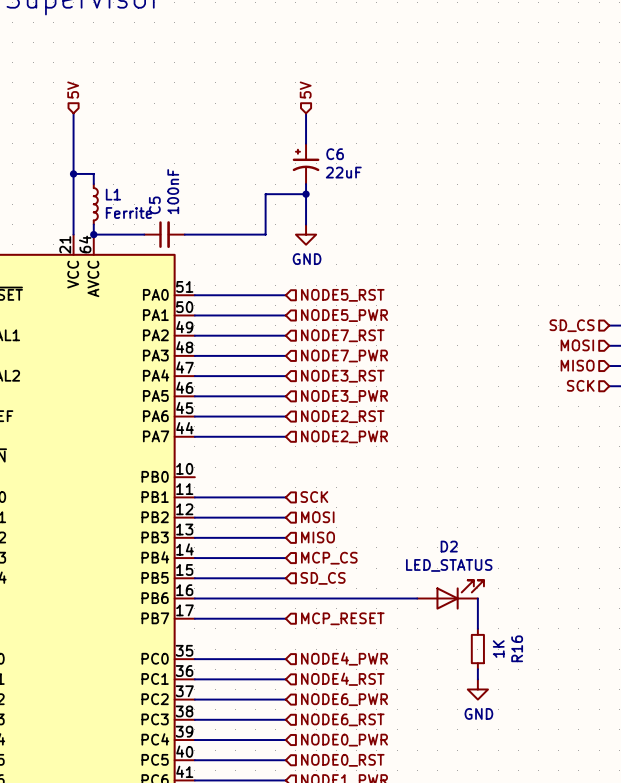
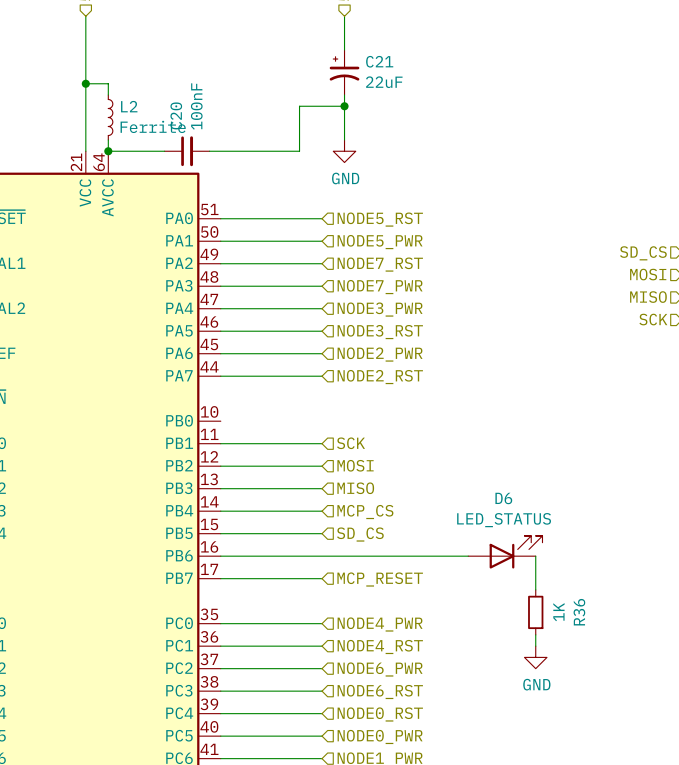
C6 name: C6 (335, 154) -> C21 (379, 61)
L1 name: L1 (113, 194) -> L2 (129, 106)
C5 name: C5 (154, 205) -> C20 (176, 115)
hierarchical label: NODE3_RST (342, 376) -> NODE3_PWR (380, 309)
hierarchical label: NODE3_PWR (344, 396) -> NODE3_RST (380, 332)
hierarchical label: NODE2_RST (342, 416) -> NODE2_PWR (380, 354)
hierarchical label: NODE2_PWR (344, 436) -> NODE2_RST (380, 377)
D2 name: D2 (449, 546) -> D6 (503, 498)
R16 name: R16 (517, 648) -> R36 (579, 612)
hierarchical label: NODE0_PWR (344, 740) -> NODE0_RST (380, 714)
hierarchical label: NODE0_RST (342, 760) -> NODE0_PWR (380, 736)

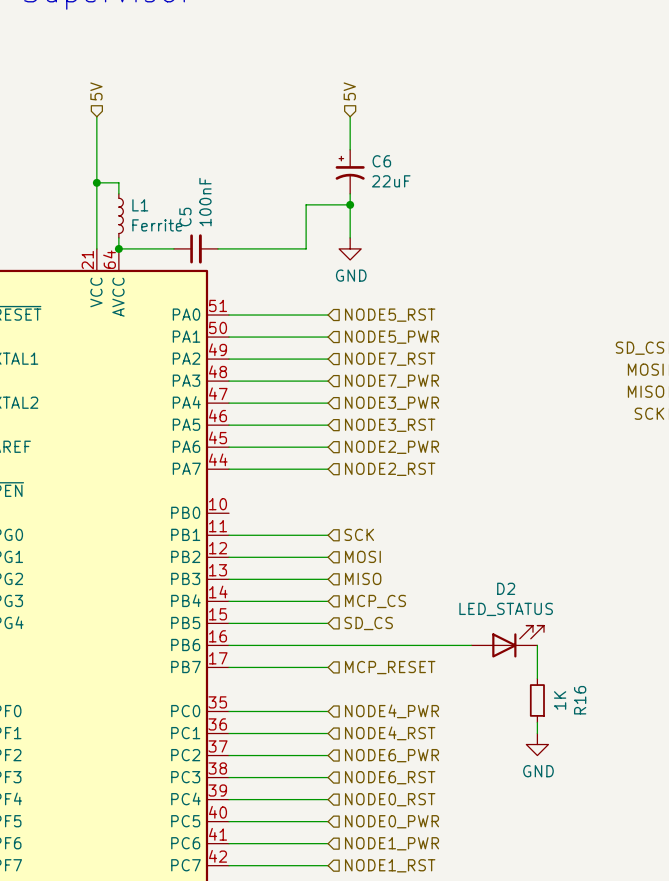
C21 name: C21 (379, 61) -> C6 (381, 161)
L2 name: L2 (129, 106) -> L1 (140, 205)
C20 name: C20 (176, 115) -> C5 (185, 217)
D6 name: D6 (503, 498) -> D2 (506, 588)
R36 name: R36 (579, 612) -> R16 (580, 700)

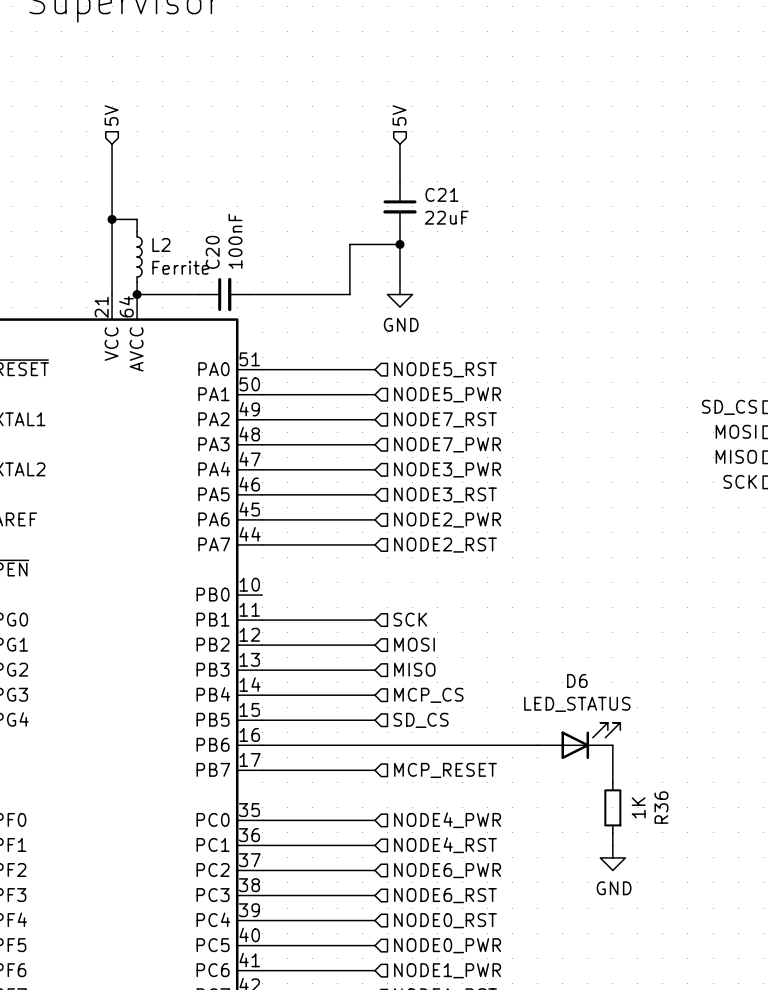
C6: 22uF (350, 171) -> none
C21: none -> 22uF (399, 206)
L1 name: L1 (140, 205) -> L2 (161, 244)
C5 name: C5 (185, 217) -> C20 (212, 252)
D2 name: D2 (506, 588) -> D6 (577, 680)
R16 name: R16 (580, 700) -> R36 (661, 807)

